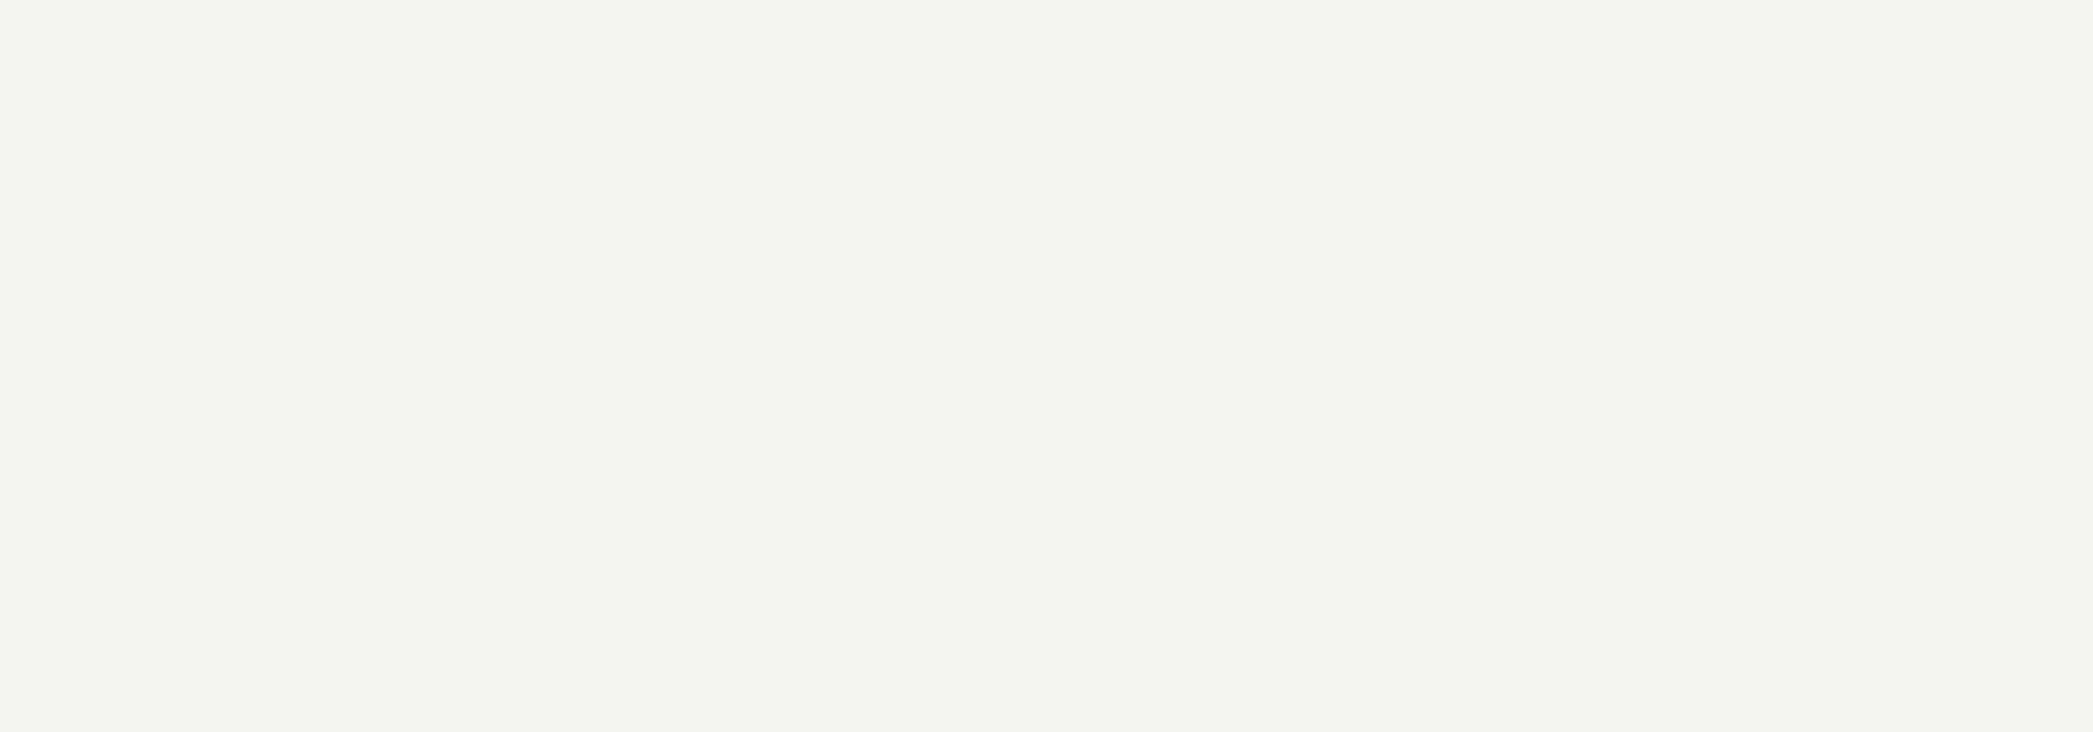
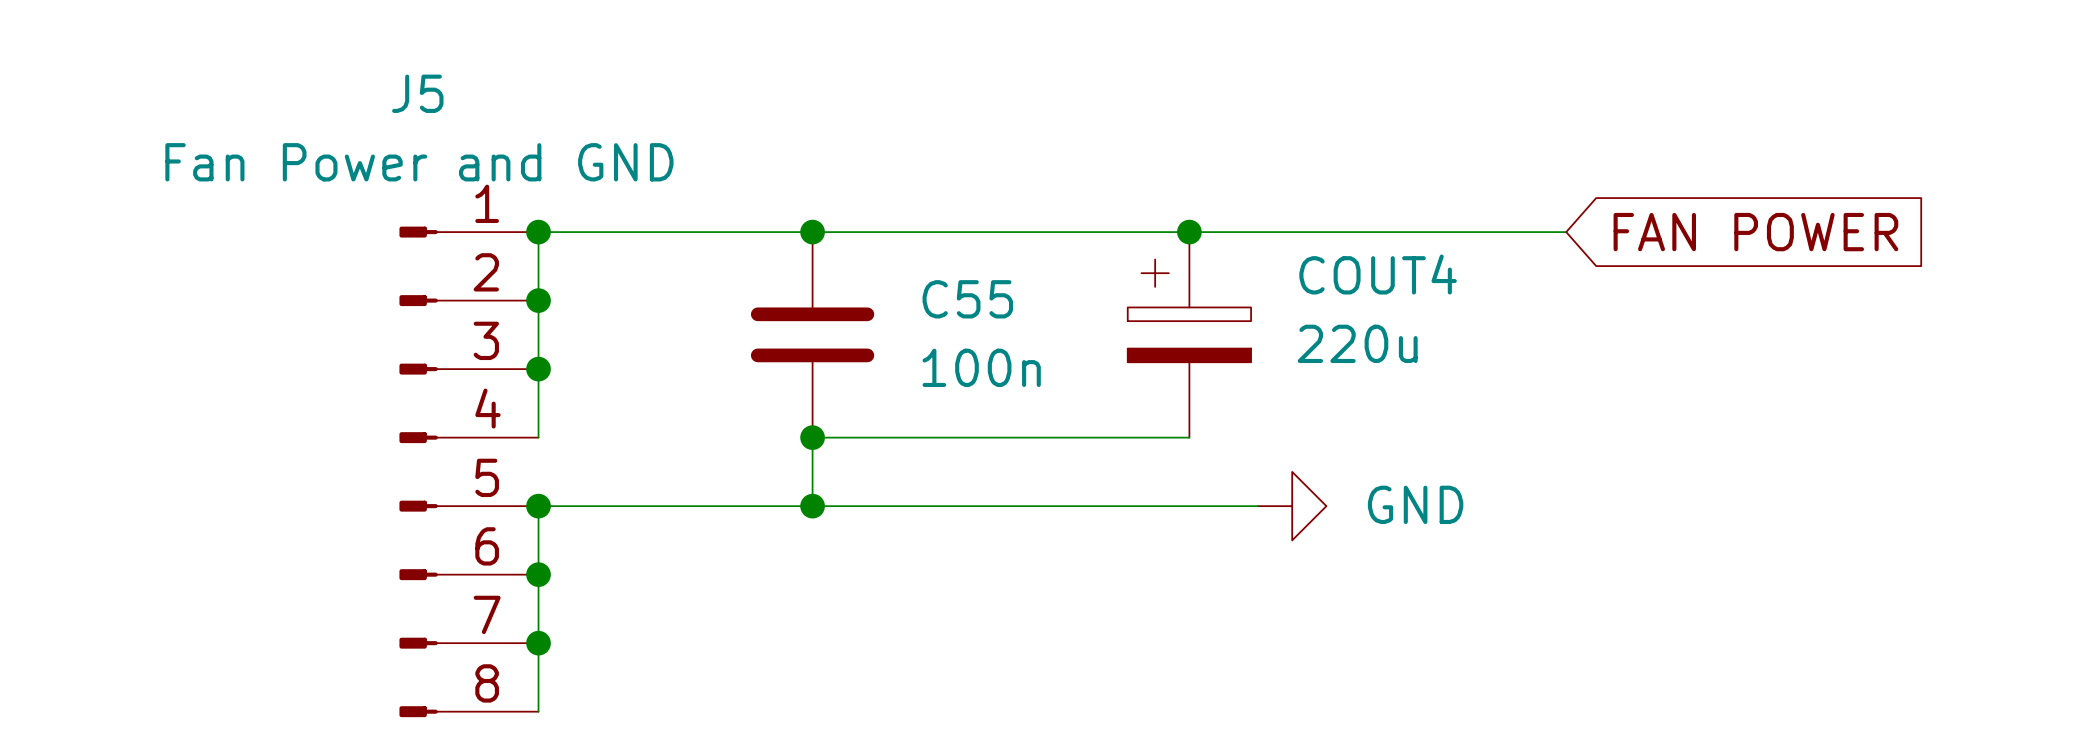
junction: none -> (538, 232)
junction: none -> (812, 232)
junction: none -> (1189, 232)
wire: none -> (1566, 232) (538, 232) (538, 437)
global label: none -> FAN POWER (1755, 232)
junction: none -> (538, 300)
C55: none -> 100n (812, 334)
COUT4: none -> 220u (1189, 334)
junction: none -> (538, 369)
junction: none -> (812, 437)
wire: none -> (1189, 437) (812, 437) (812, 506)
J5: none -> Fan Power and GND (468, 471)
junction: none -> (538, 506)
junction: none -> (812, 506)
wire: none -> (1257, 506) (538, 506) (538, 711)
power symbol: none -> GND (1292, 506)
junction: none -> (538, 574)
junction: none -> (538, 643)

